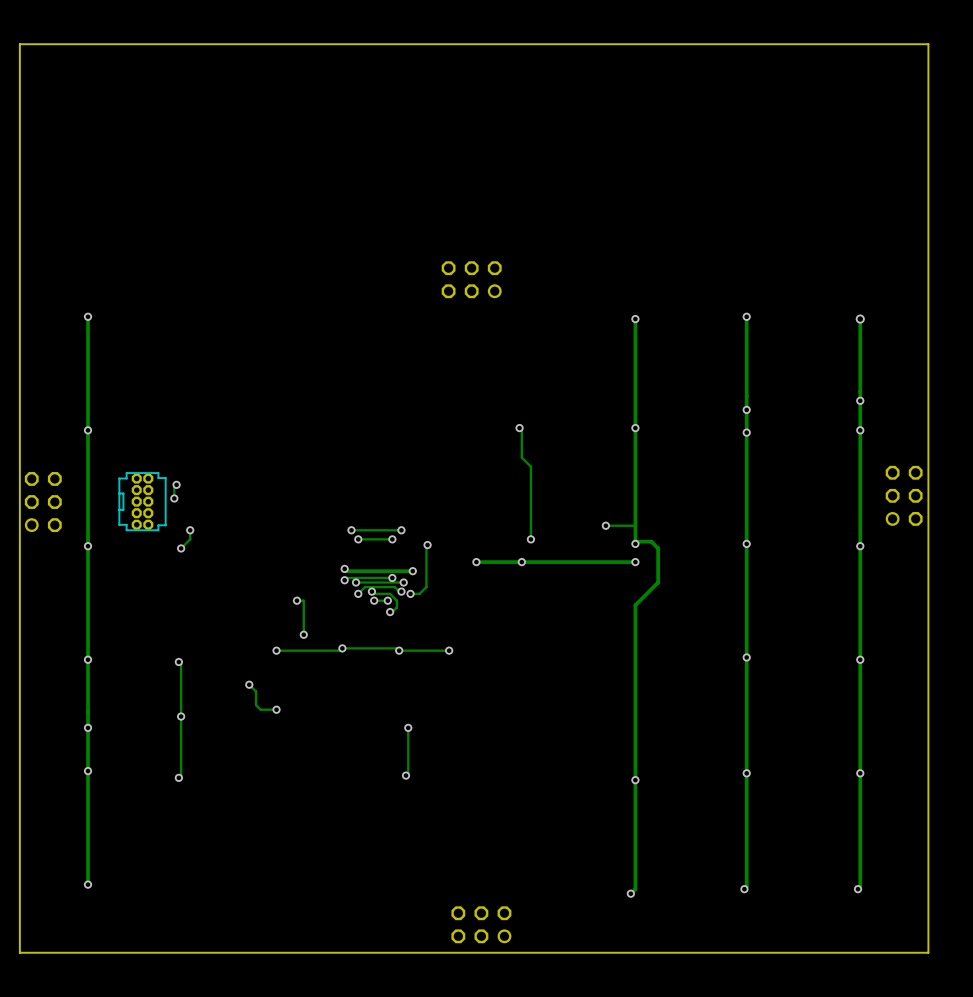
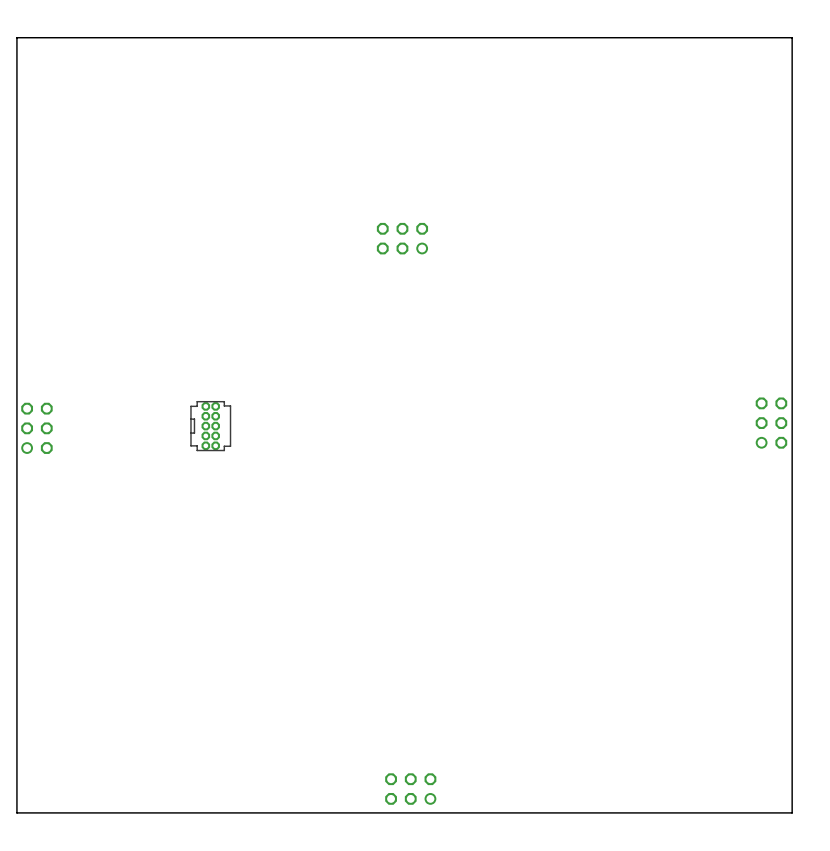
track: (88, 316) (88, 884) -> none
via: (88, 316) -> none
track: (746, 316) (746, 886) (744, 889) -> none
via: (746, 316) -> none
track: (635, 319) (635, 543) (637, 541) (651, 541) (658, 548) (658, 582) (635, 605) (635, 889) (630, 893) -> none
via: (635, 319) -> none
track: (860, 319) (860, 886) (858, 889) -> none
via: (860, 319) -> none
via: (860, 400) -> none
via: (746, 409) -> none
track: (519, 428) (521, 430) (521, 457) (530, 466) (530, 539) -> none
via: (519, 428) -> none
via: (635, 428) -> none
via: (88, 430) -> none
via: (860, 430) -> none
via: (746, 432) -> none
track: (176, 484) (174, 487) (174, 498) -> none
via: (176, 484) -> none
via: (174, 498) -> none
part position: (142, 501) -> (210, 426)
via: (605, 525) -> none
track: (635, 525) (605, 525) -> none
track: (190, 530) (190, 539) (181, 548) -> none
via: (190, 530) -> none
via: (351, 530) -> none
track: (401, 530) (351, 530) -> none
via: (401, 530) -> none
via: (358, 539) -> none
track: (392, 539) (358, 539) -> none
via: (392, 539) -> none
via: (530, 539) -> none
track: (428, 543) (426, 546) (426, 587) (419, 593) (410, 593) -> none
via: (635, 543) -> none
via: (746, 543) -> none
via: (427, 545) -> none
via: (88, 546) -> none
via: (860, 546) -> none
via: (181, 548) -> none
via: (476, 562) -> none
via: (521, 562) -> none
track: (635, 562) (476, 562) -> none
via: (635, 562) -> none
track: (344, 568) (346, 571) (412, 571) -> none
via: (344, 568) -> none
via: (412, 571) -> none
track: (392, 577) (346, 577) (344, 580) -> none
via: (392, 577) -> none
via: (344, 580) -> none
via: (356, 582) -> none
track: (403, 582) (356, 582) -> none
via: (403, 582) -> none
track: (371, 591) (374, 593) (390, 593) (396, 600) (396, 607) (390, 612) -> none
via: (371, 591) -> none
track: (401, 591) (394, 587) (365, 587) (358, 593) -> none
via: (401, 591) -> none
via: (358, 593) -> none
via: (410, 593) -> none
track: (296, 600) (303, 600) (303, 634) -> none
via: (296, 600) -> none
via: (374, 600) -> none
track: (387, 600) (374, 600) -> none
via: (387, 600) -> none
via: (390, 612) -> none
via: (303, 634) -> none
via: (342, 648) -> none
via: (276, 650) -> none
via: (399, 650) -> none
track: (449, 650) (399, 650) (396, 648) (276, 650) -> none
via: (449, 650) -> none
via: (746, 657) -> none
via: (88, 659) -> none
via: (860, 659) -> none
track: (178, 662) (181, 664) (181, 775) (178, 777) -> none
via: (178, 662) -> none
track: (249, 684) (256, 691) (256, 705) (260, 709) (276, 709) -> none
via: (249, 684) -> none
via: (276, 709) -> none
via: (181, 716) -> none
via: (88, 727) -> none
track: (408, 727) (408, 773) (406, 775) -> none
via: (408, 727) -> none
via: (88, 771) -> none
via: (746, 773) -> none
via: (860, 773) -> none
via: (406, 775) -> none
via: (178, 777) -> none
via: (635, 780) -> none
via: (88, 884) -> none
via: (744, 889) -> none
via: (858, 889) -> none
via: (630, 893) -> none

